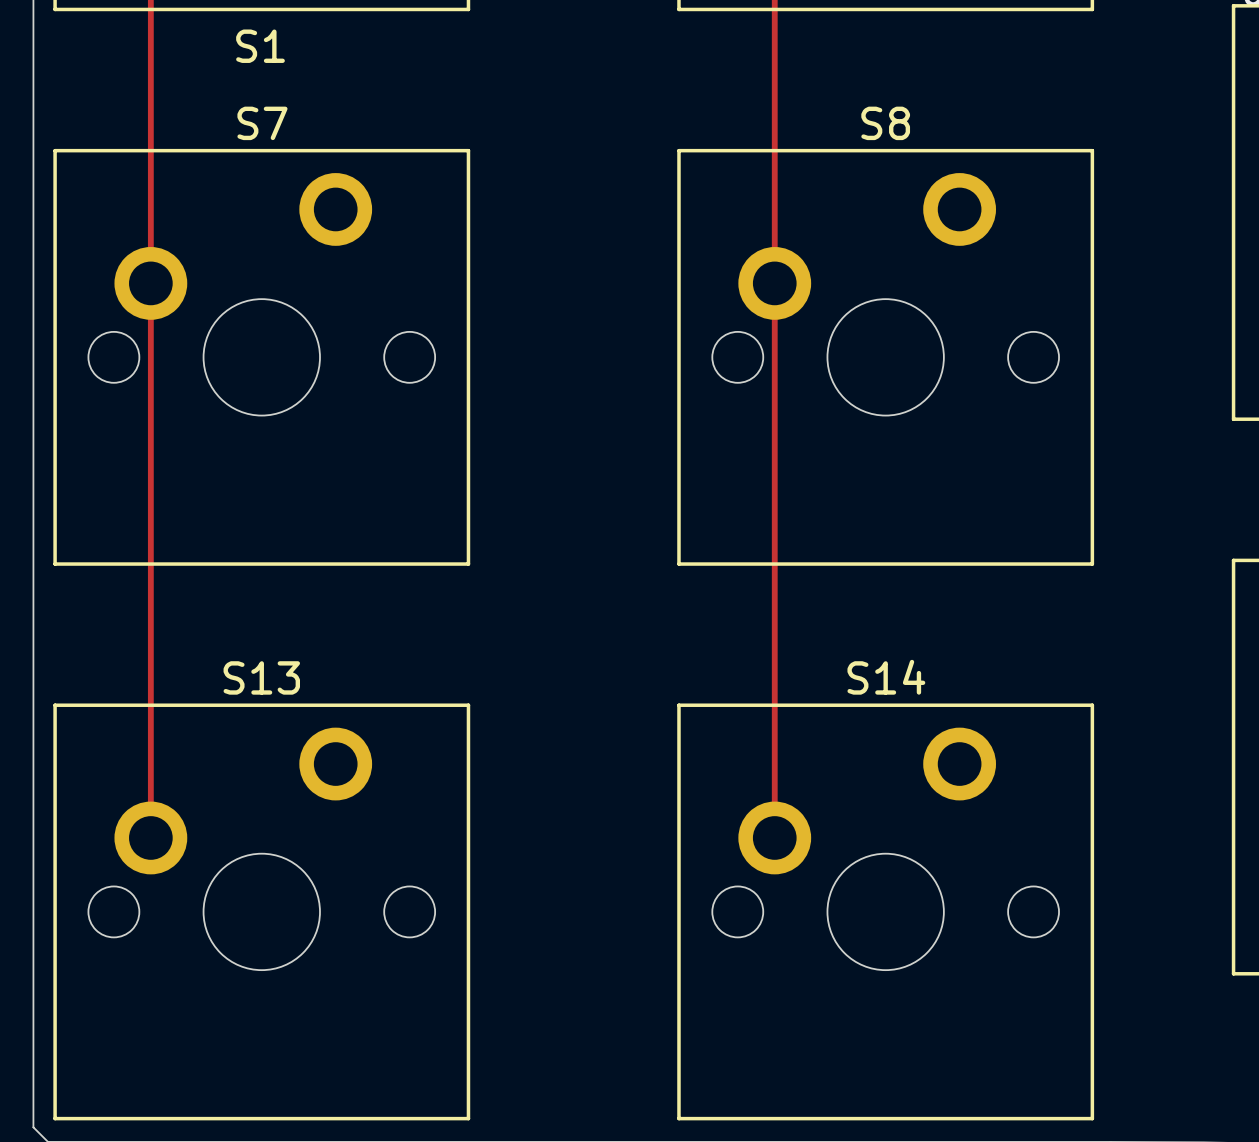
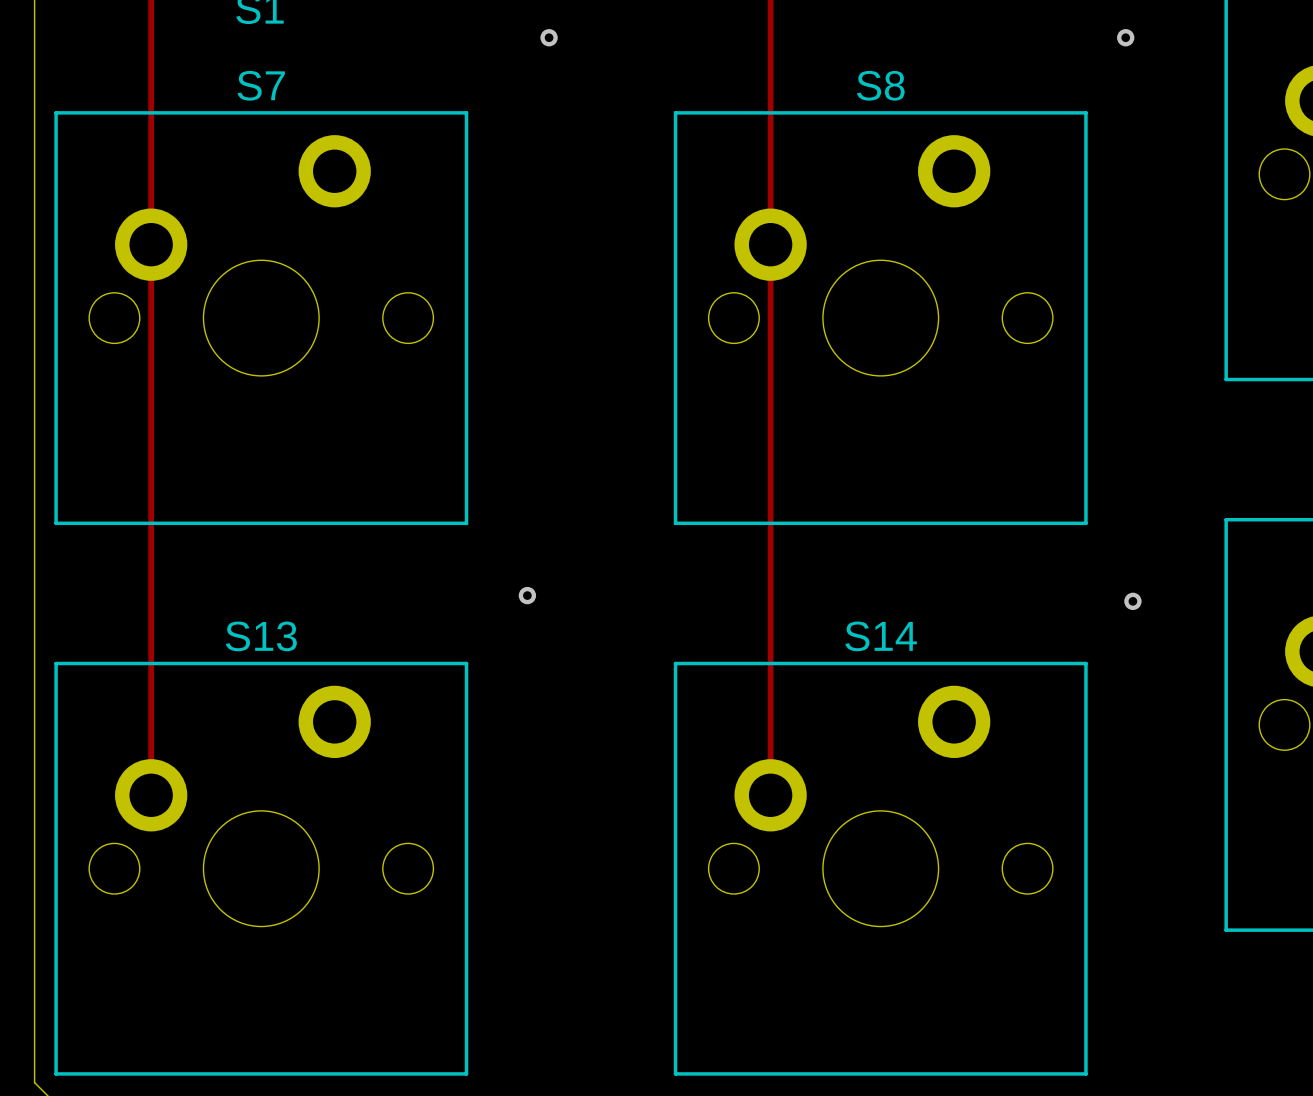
via: none -> (549, 37)
via: none -> (1125, 37)
via: none -> (527, 595)
via: none -> (1132, 601)

